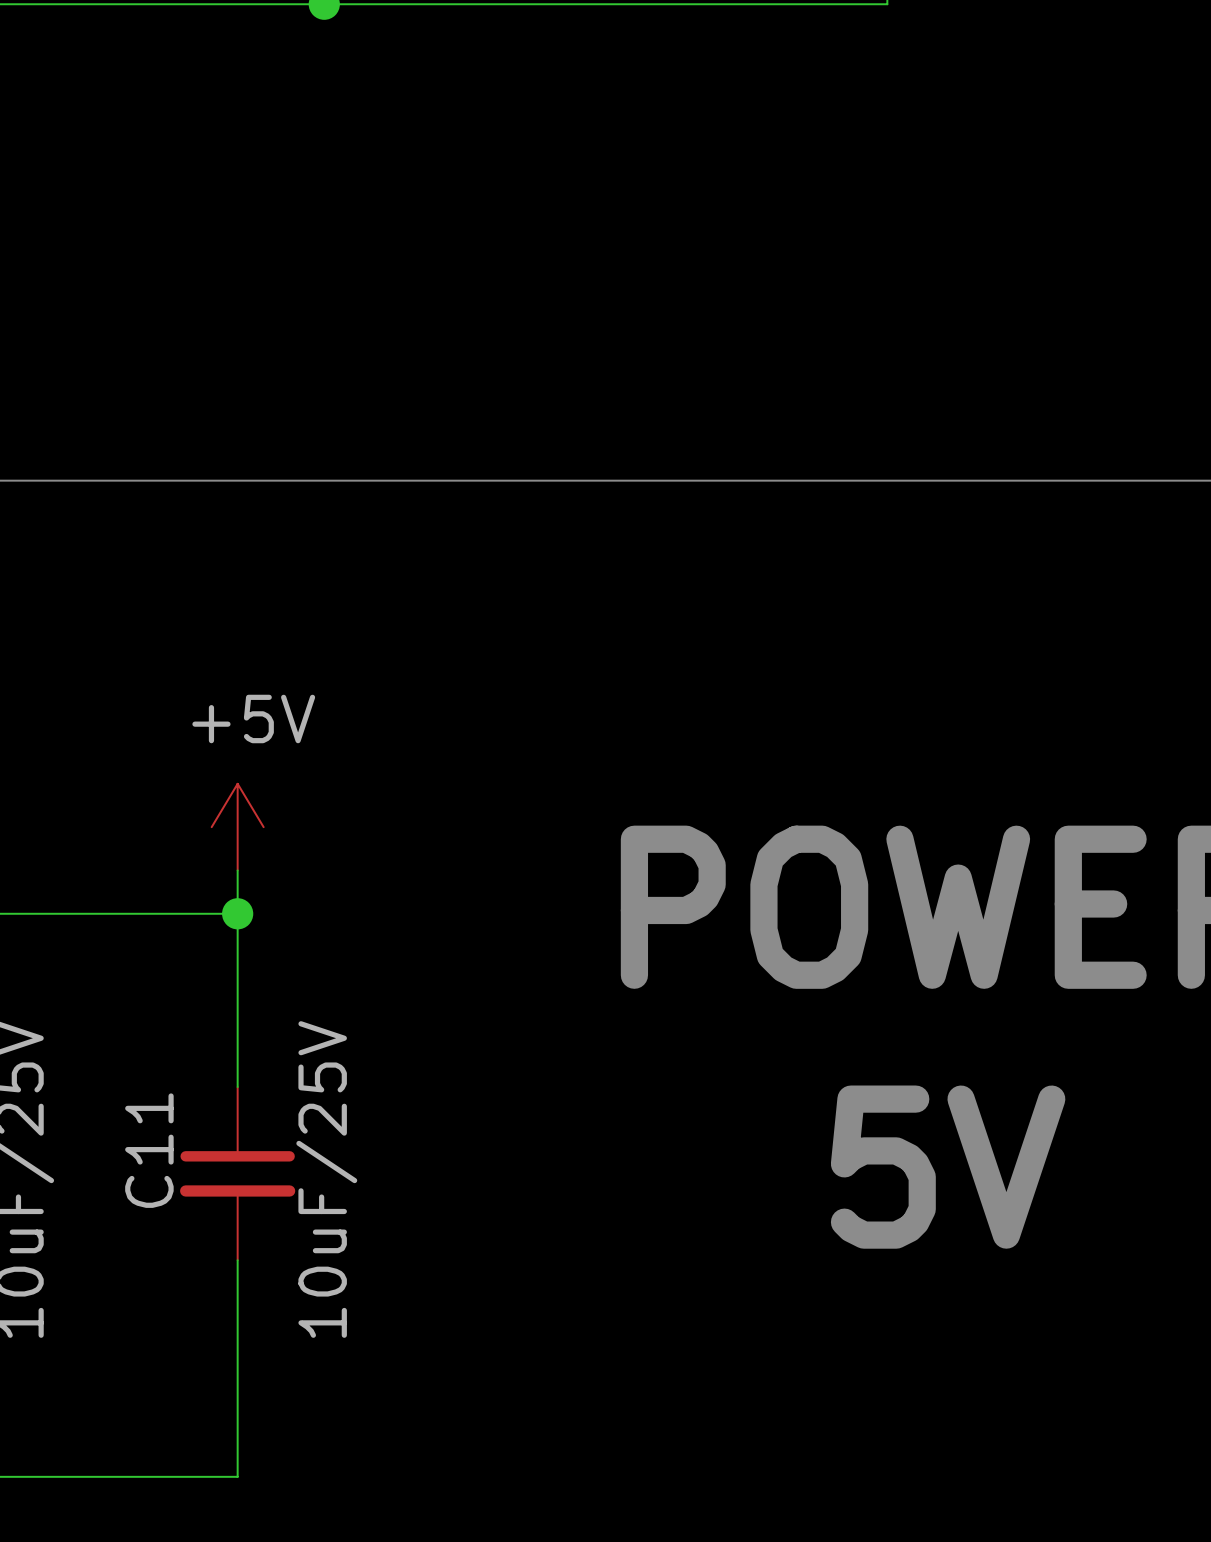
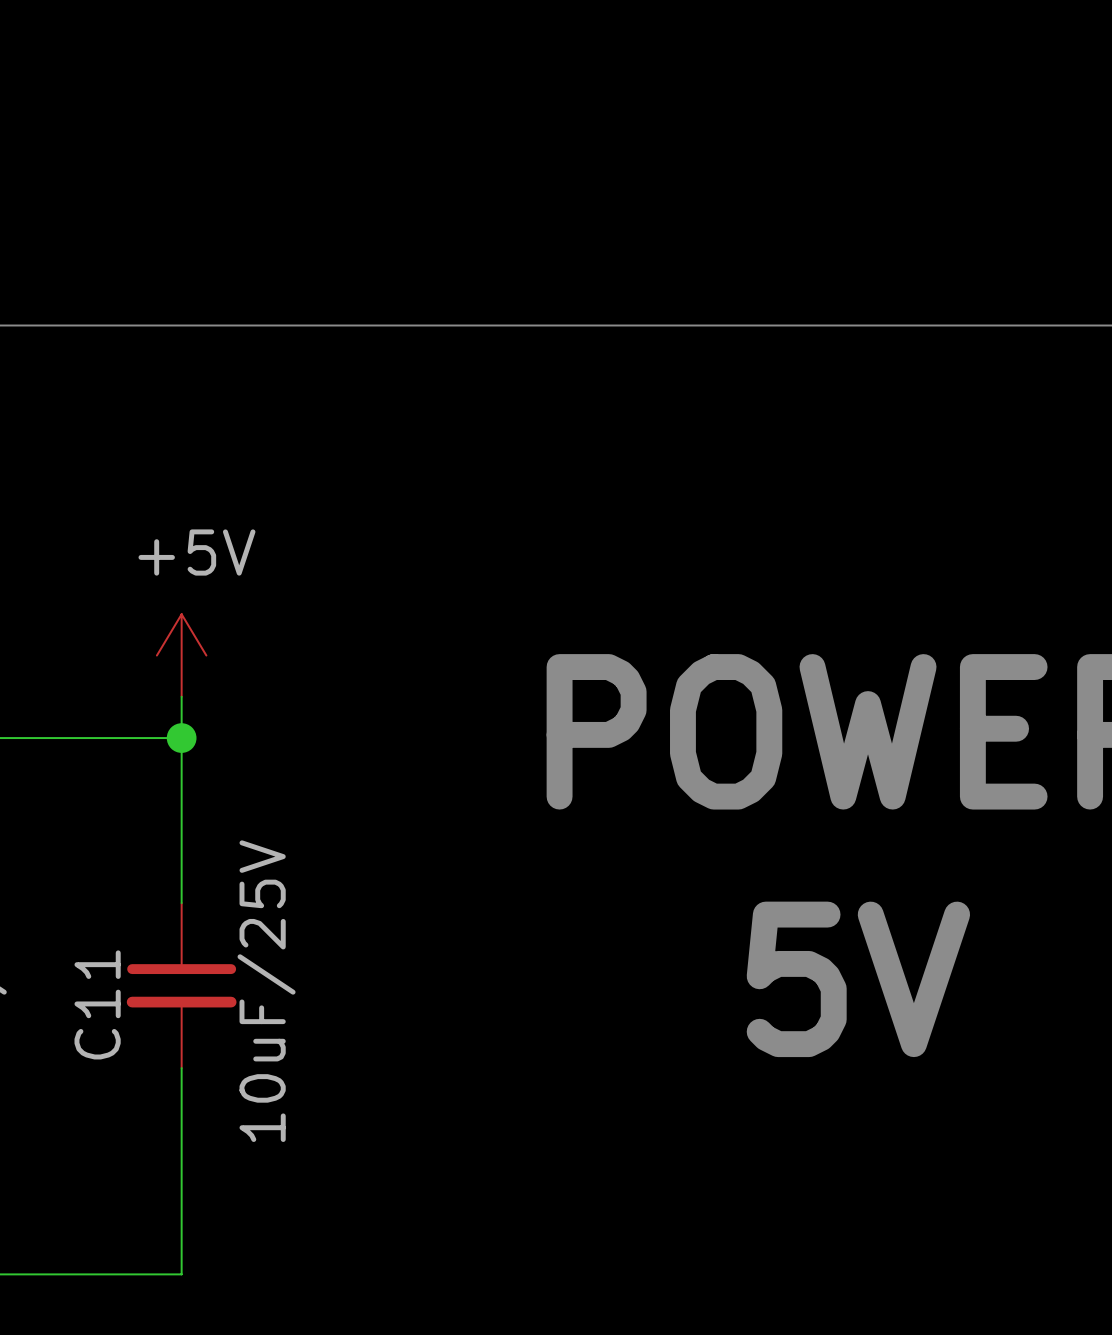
C11 name position: C11 (149, 1150) -> C11 (97, 1004)

